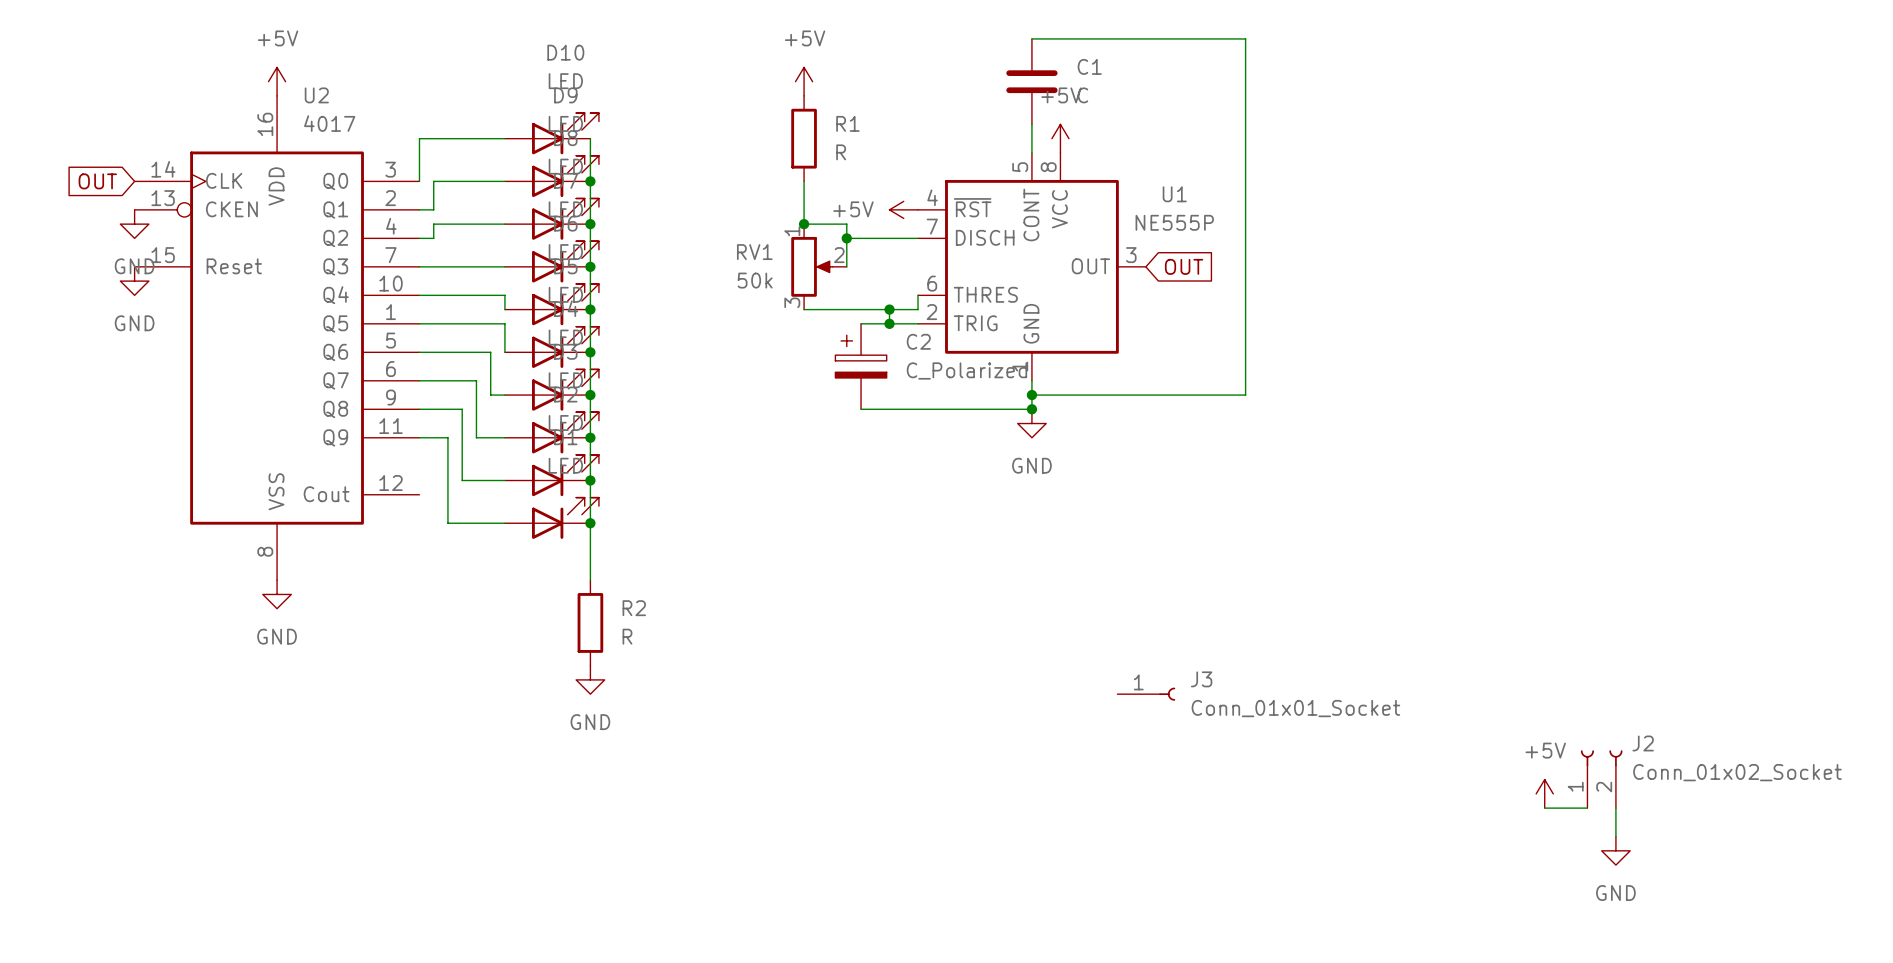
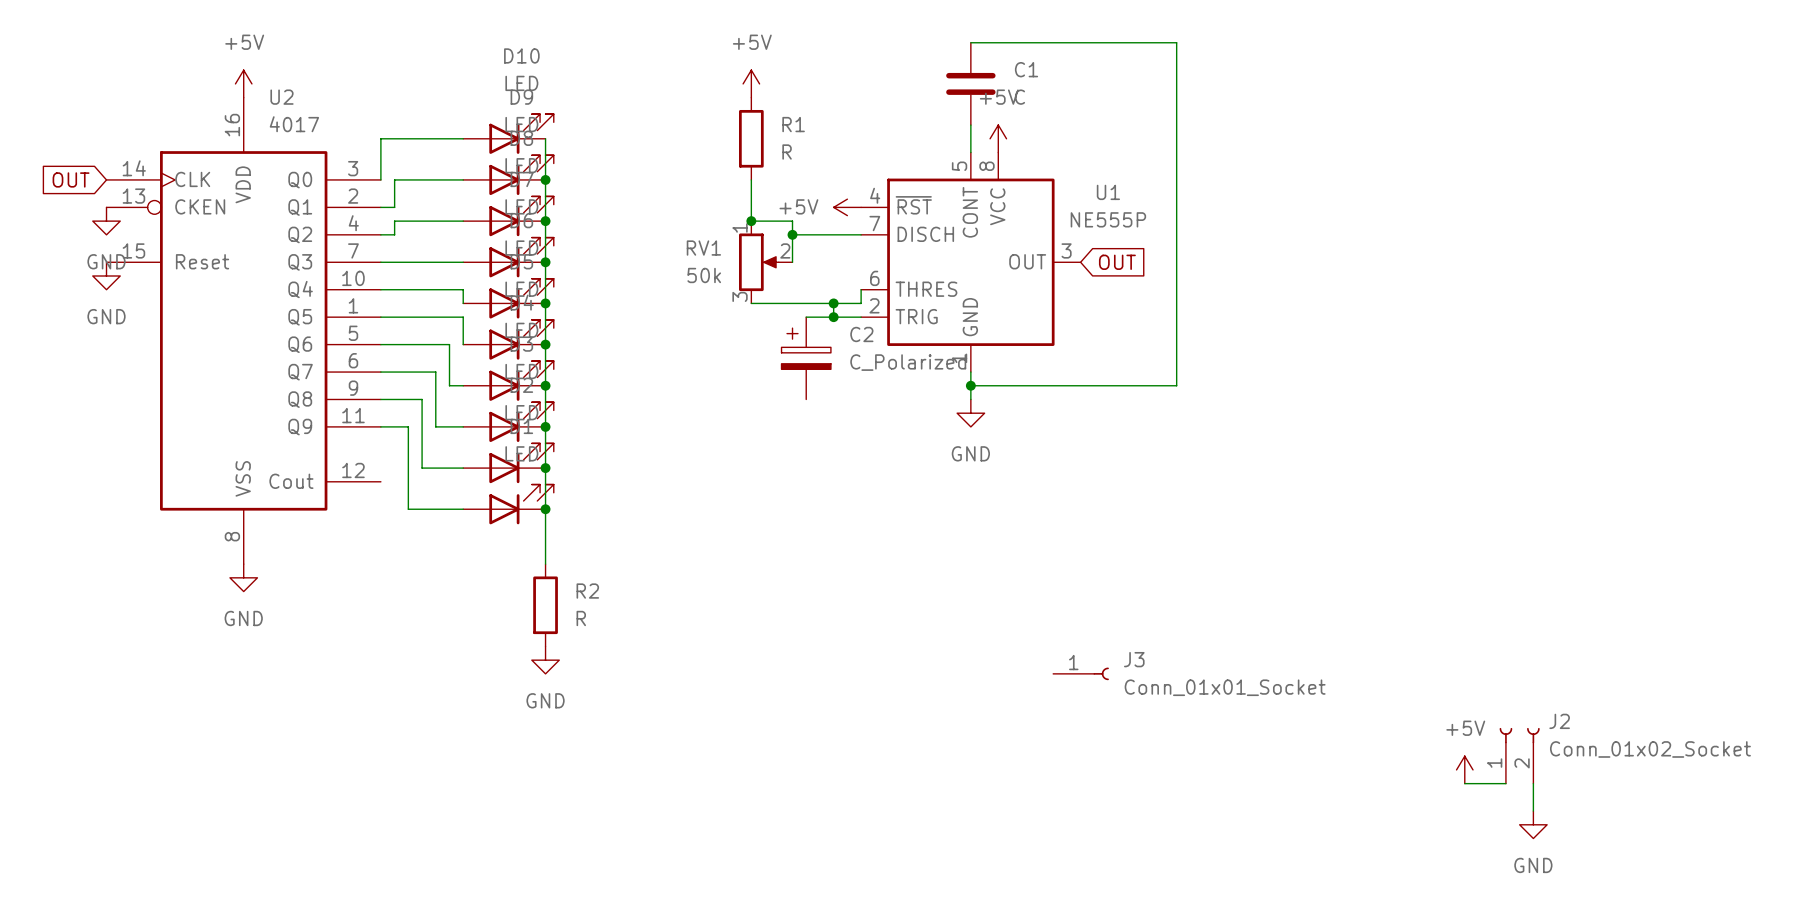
wire: (861, 409) (1031, 409) -> none
junction: (1031, 409) -> none

